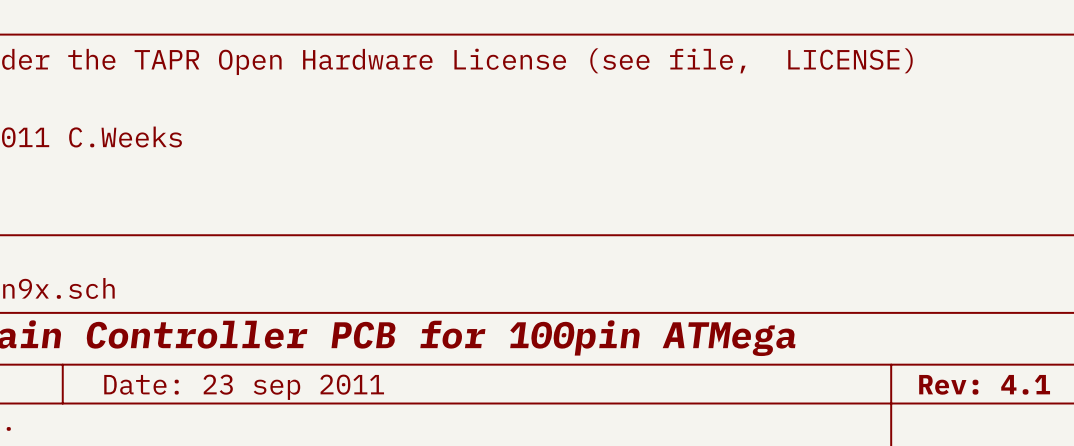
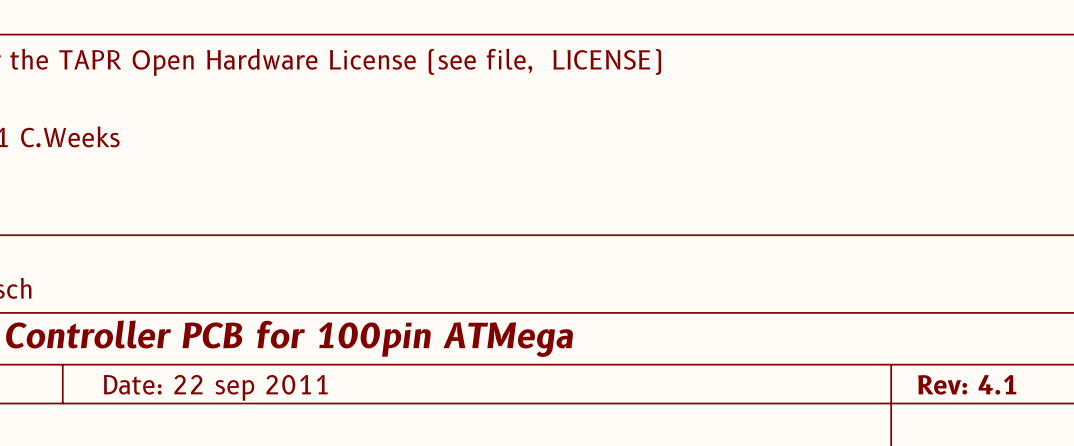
title block: Date: 23 sep 2011 (244, 387) -> Date: 22 sep 2011 (215, 387)

